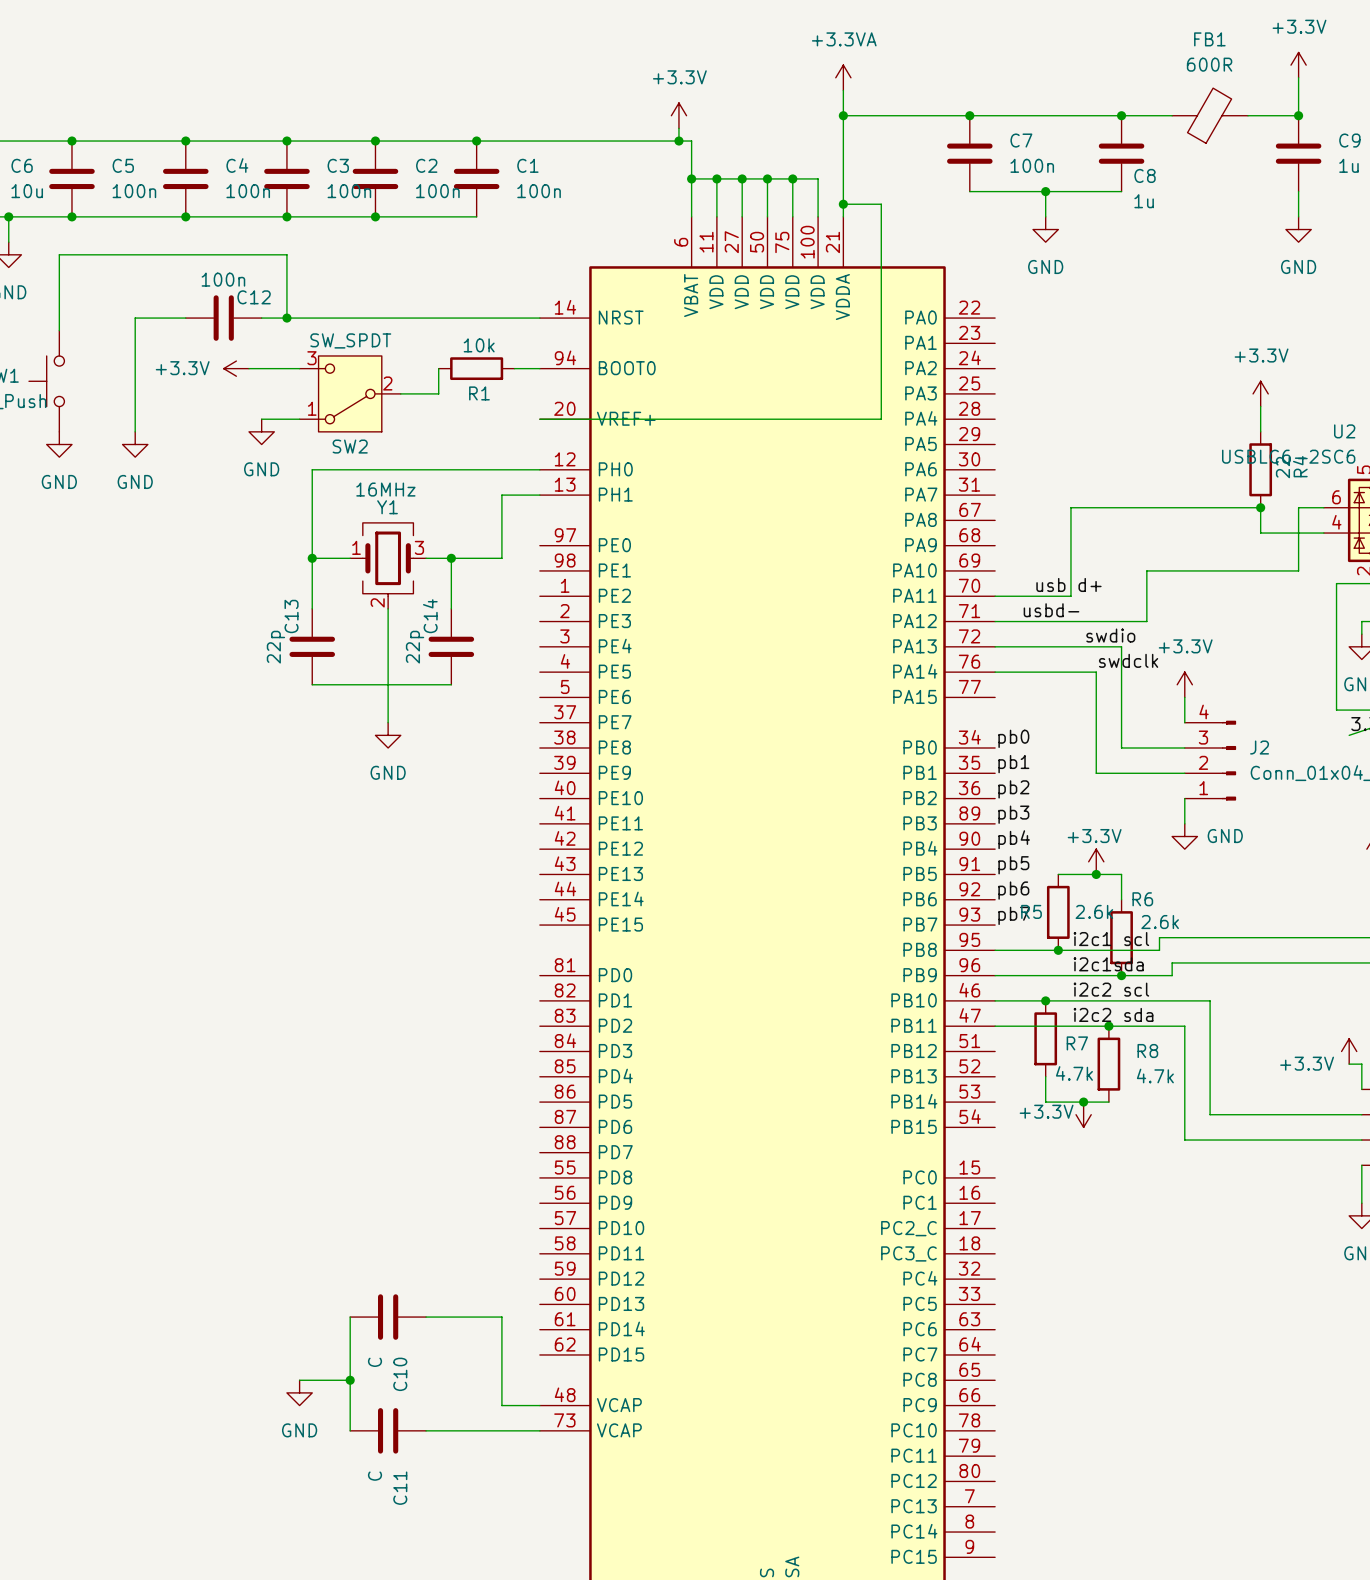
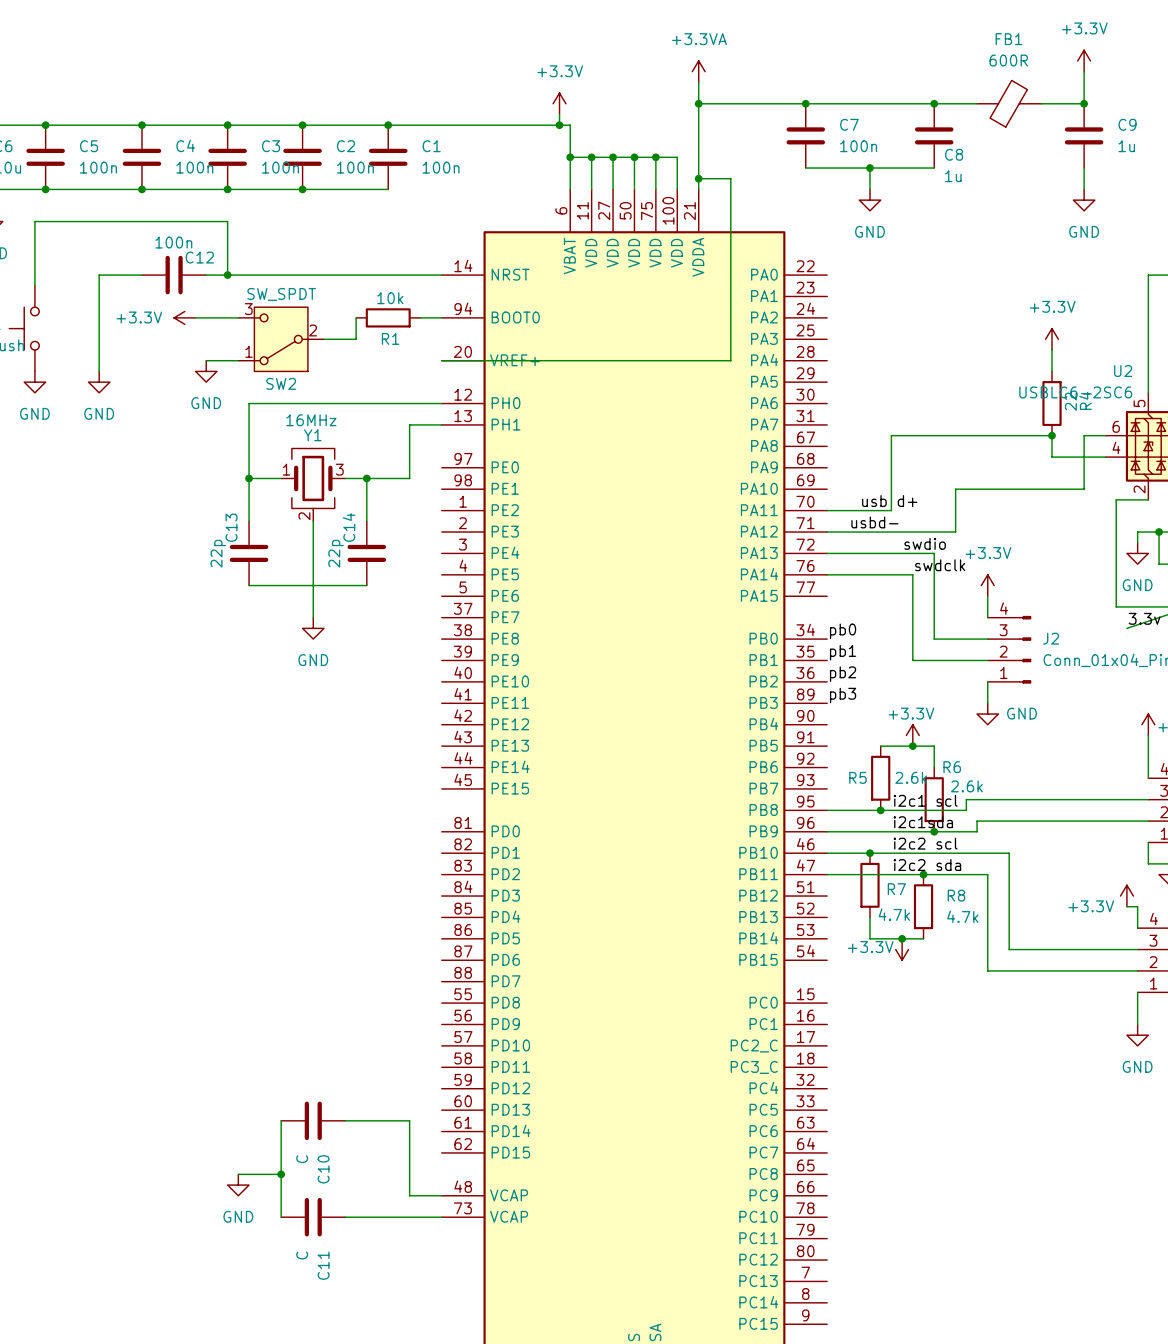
label: pb4 (1014, 839) -> none
label: pb5 (1013, 865) -> none
label: pb6 (1013, 890) -> none
label: pb7 (1014, 915) -> none

